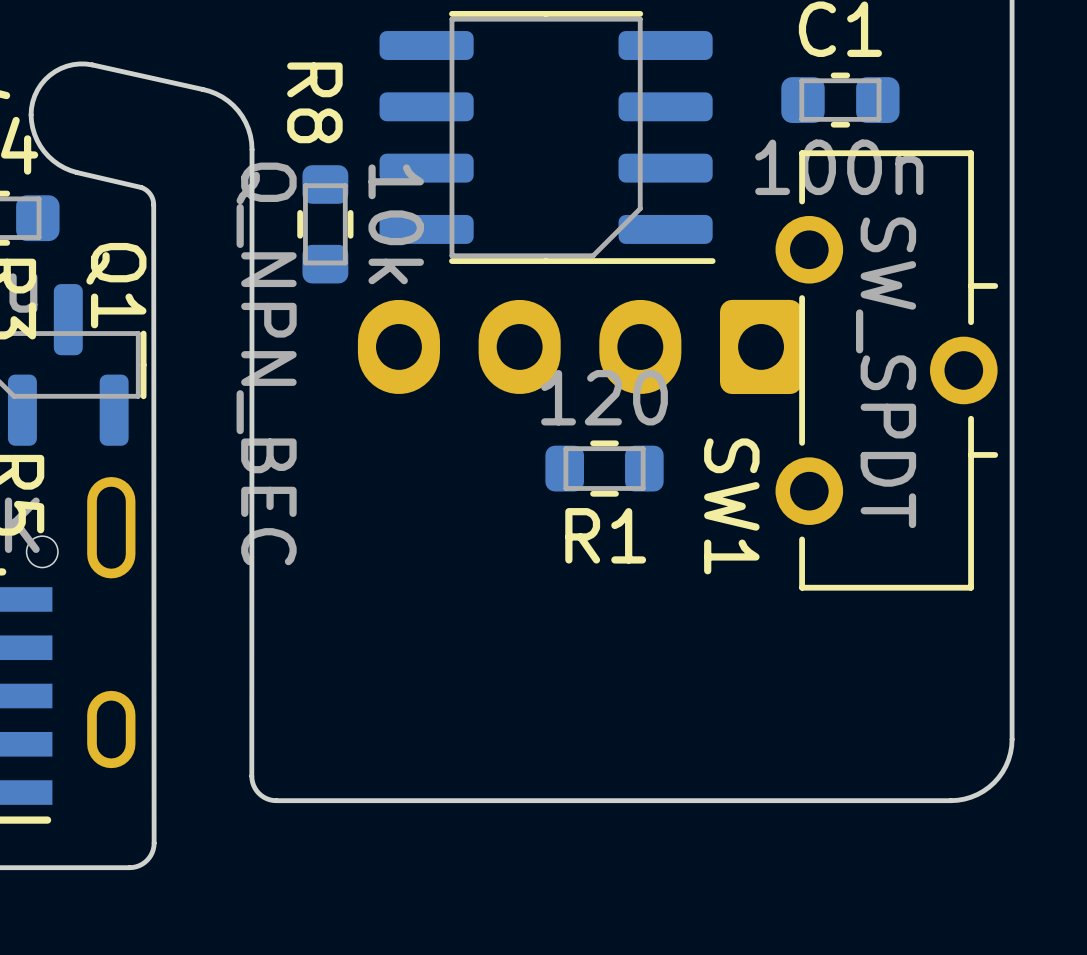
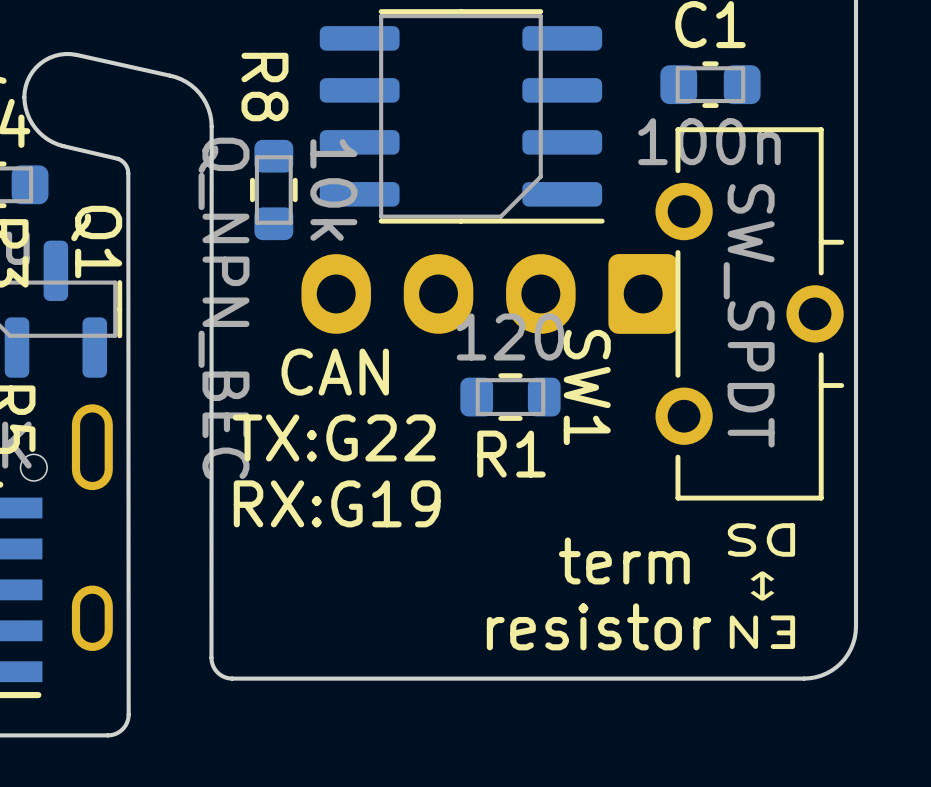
text: none -> CAN (335, 372)
SW1 name position: SW1 (731, 506) -> SW1 (587, 387)
text: none -> TX:G22 (334, 437)
text: none -> RX:G19 (337, 503)
text: none -> DS (761, 539)
text: none -> term (624, 560)
text: none -> ↕ (762, 586)
text: none -> resistor (599, 626)
text: none -> EN (762, 632)

